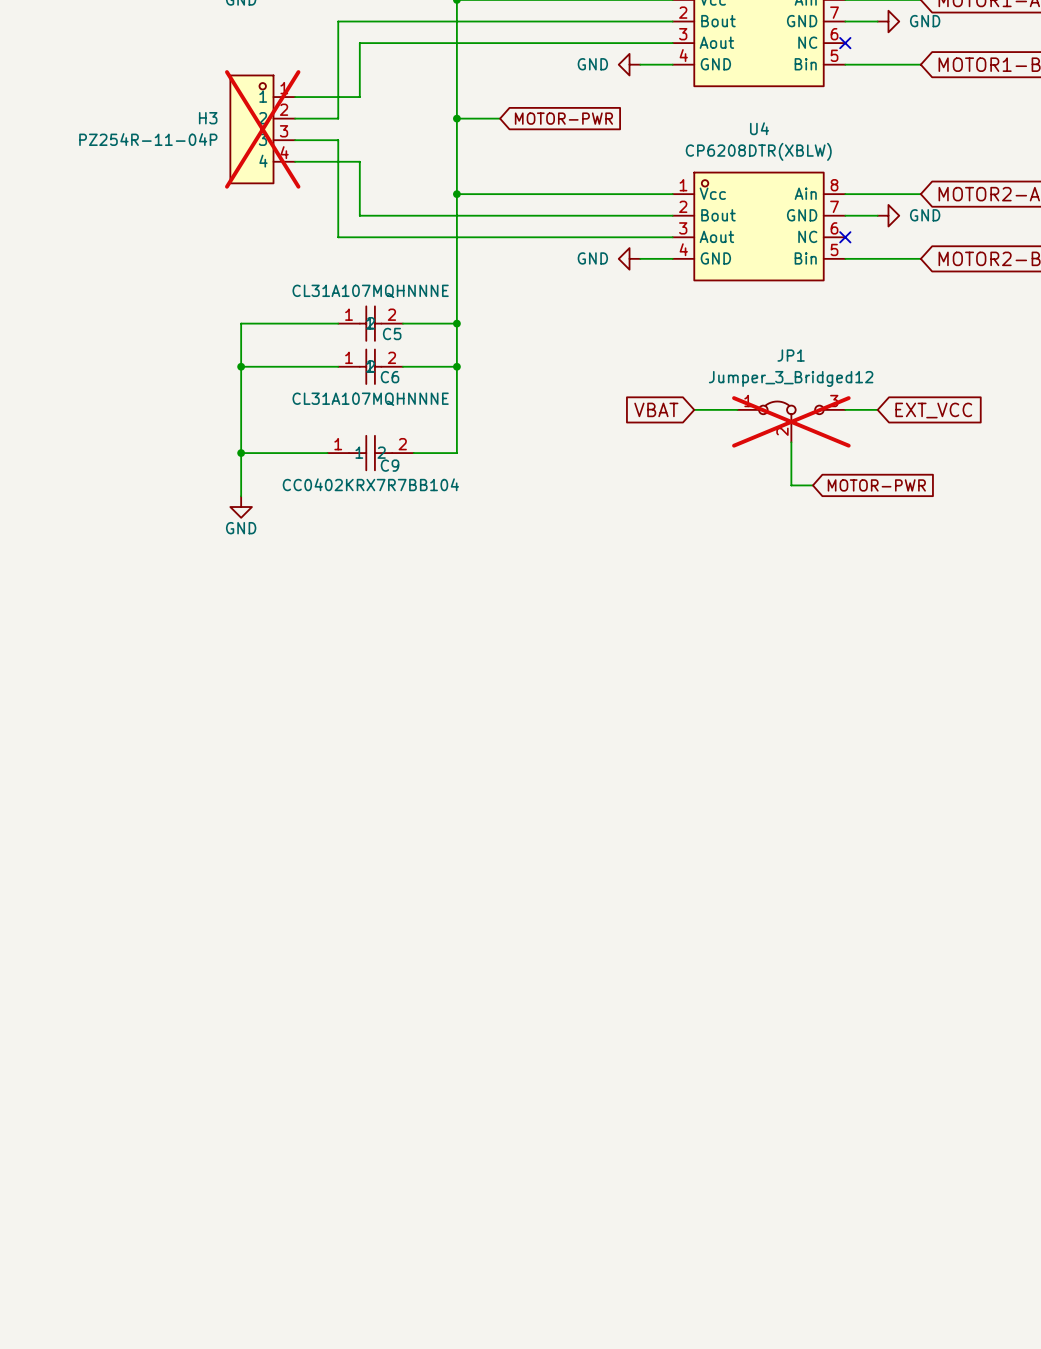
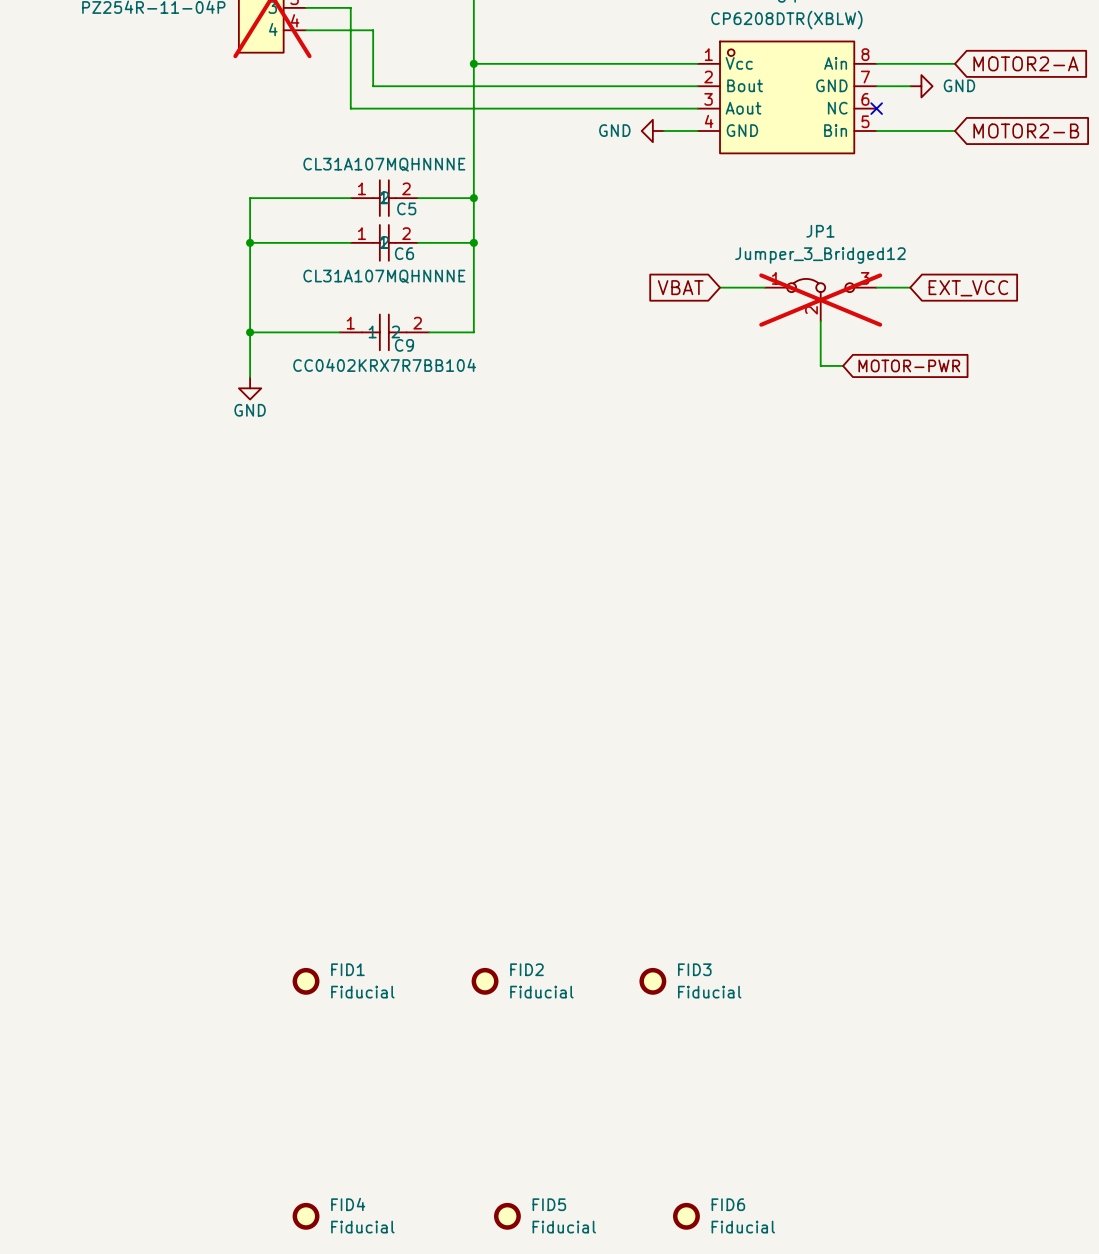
FID1: none -> Fiducial (306, 981)
FID2: none -> Fiducial (485, 981)
FID3: none -> Fiducial (652, 981)
FID4: none -> Fiducial (306, 1216)
FID5: none -> Fiducial (507, 1216)
FID6: none -> Fiducial (686, 1216)

